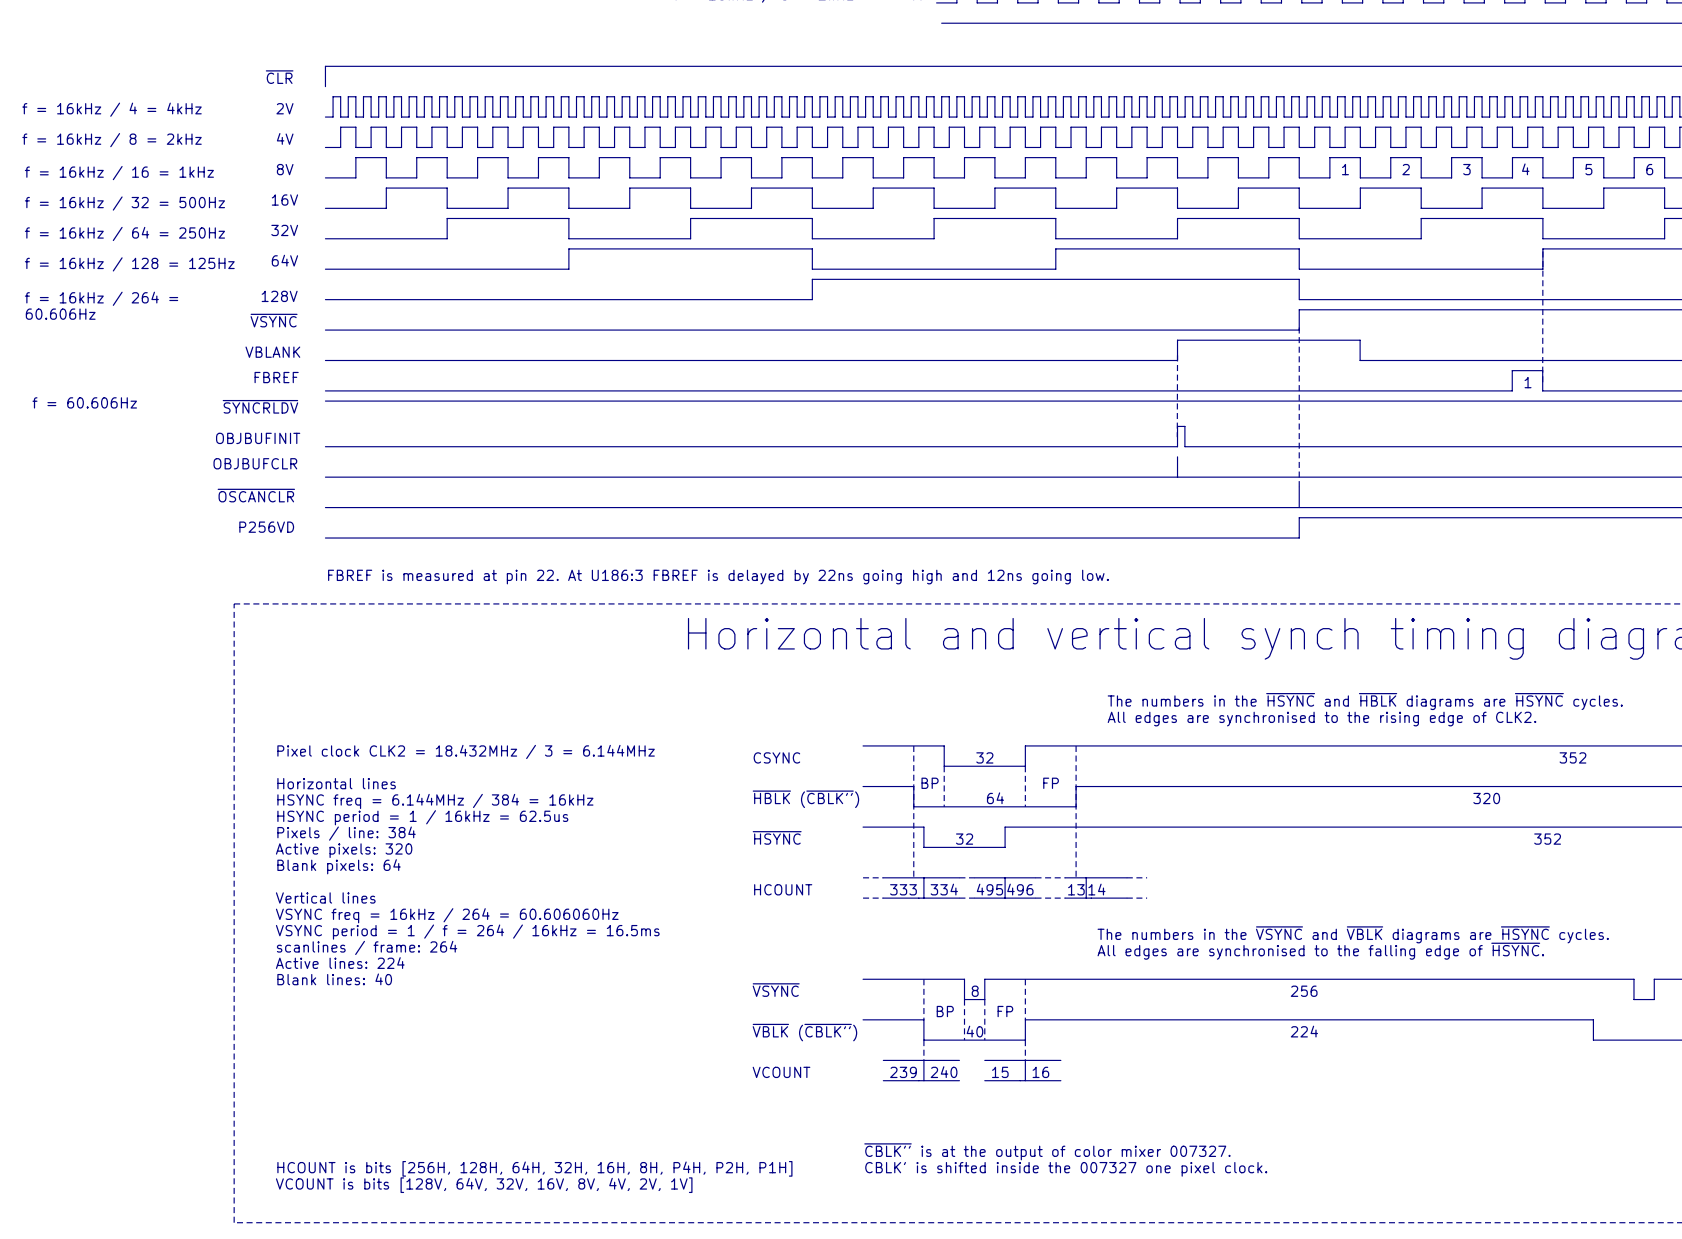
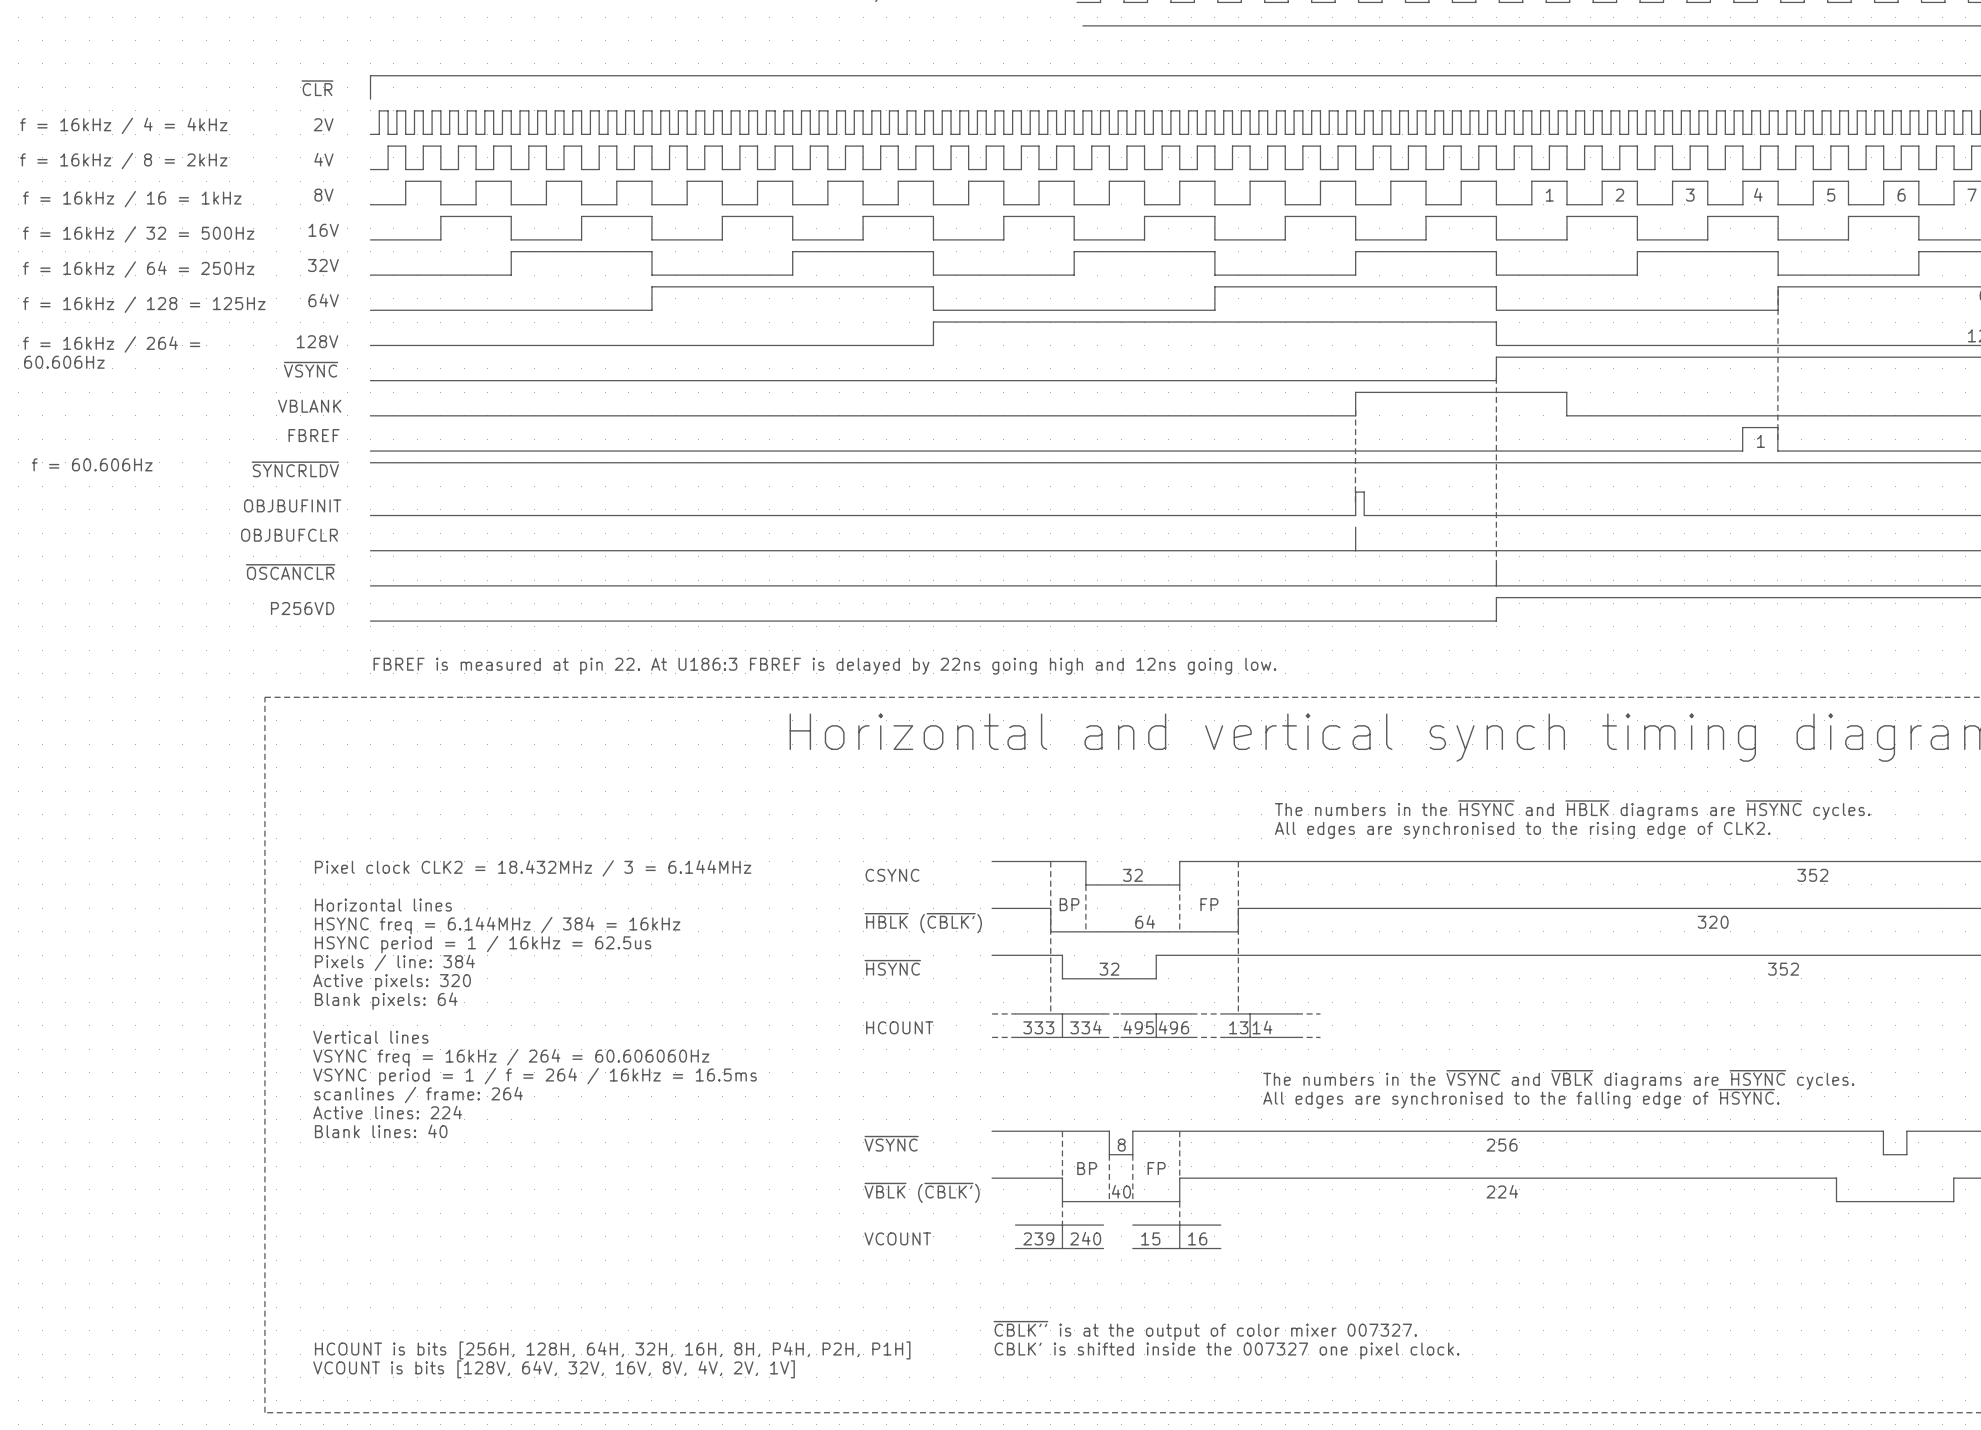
text: ~{HBLK} (~{CBLK''}) (805, 799) -> ~{HBLK} (~{CBLK'}) (923, 923)
text: ~{VBLK} (~{CBLK''}) (804, 1032) -> ~{VBLK} (~{CBLK'}) (922, 1192)

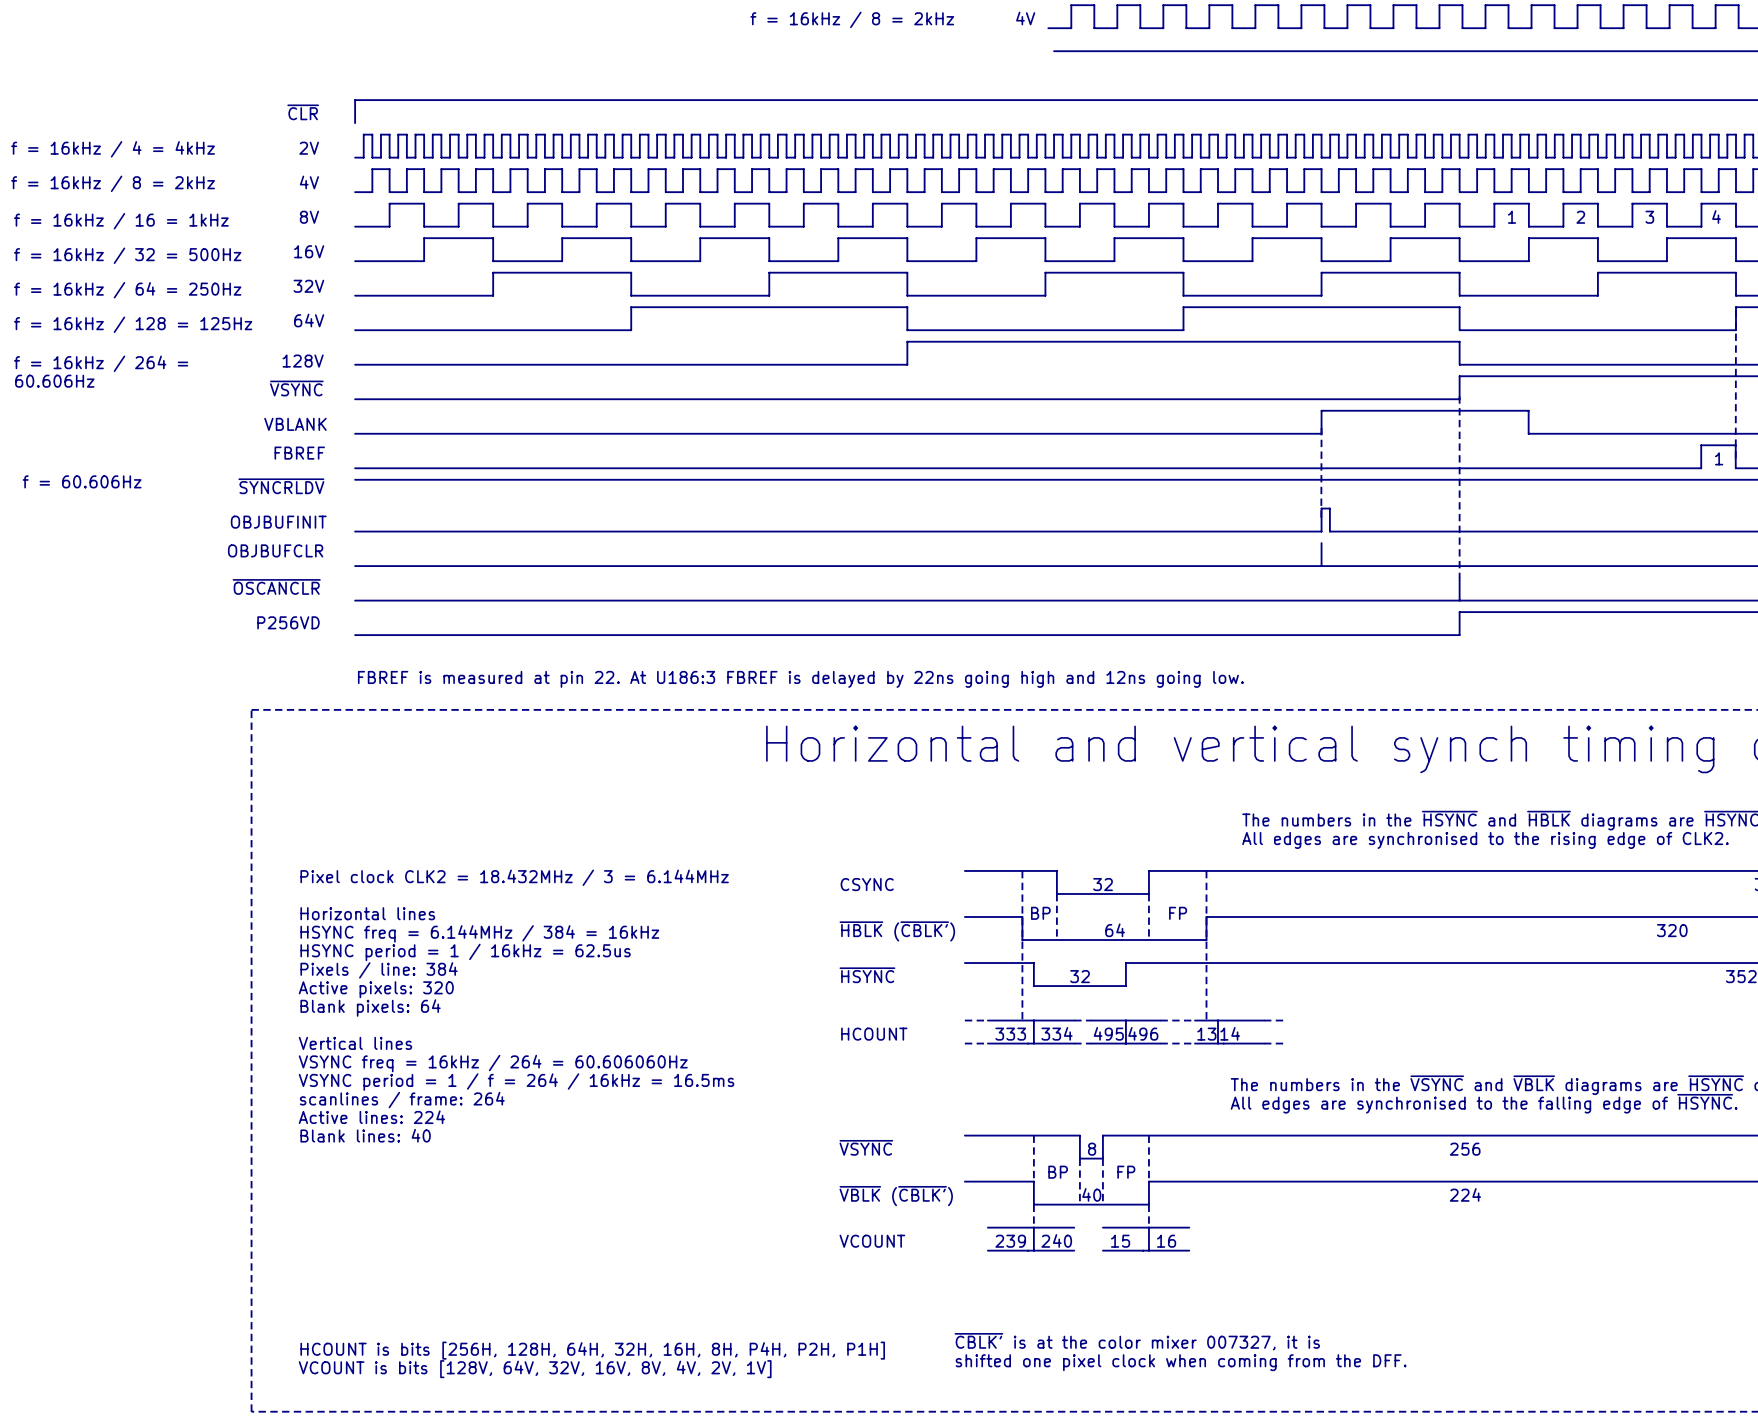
text: ~{CBLK''} is at the output of color mixer 007327. (1205, 1330) -> ~{CBLK'} is at the color mixer 007327, it is (1137, 1341)
text: CBLK' is shifted inside the 007327 one pixel clock. (1227, 1350) -> none
text: none -> shifted one pixel clock when coming from the DFF. (1181, 1362)

